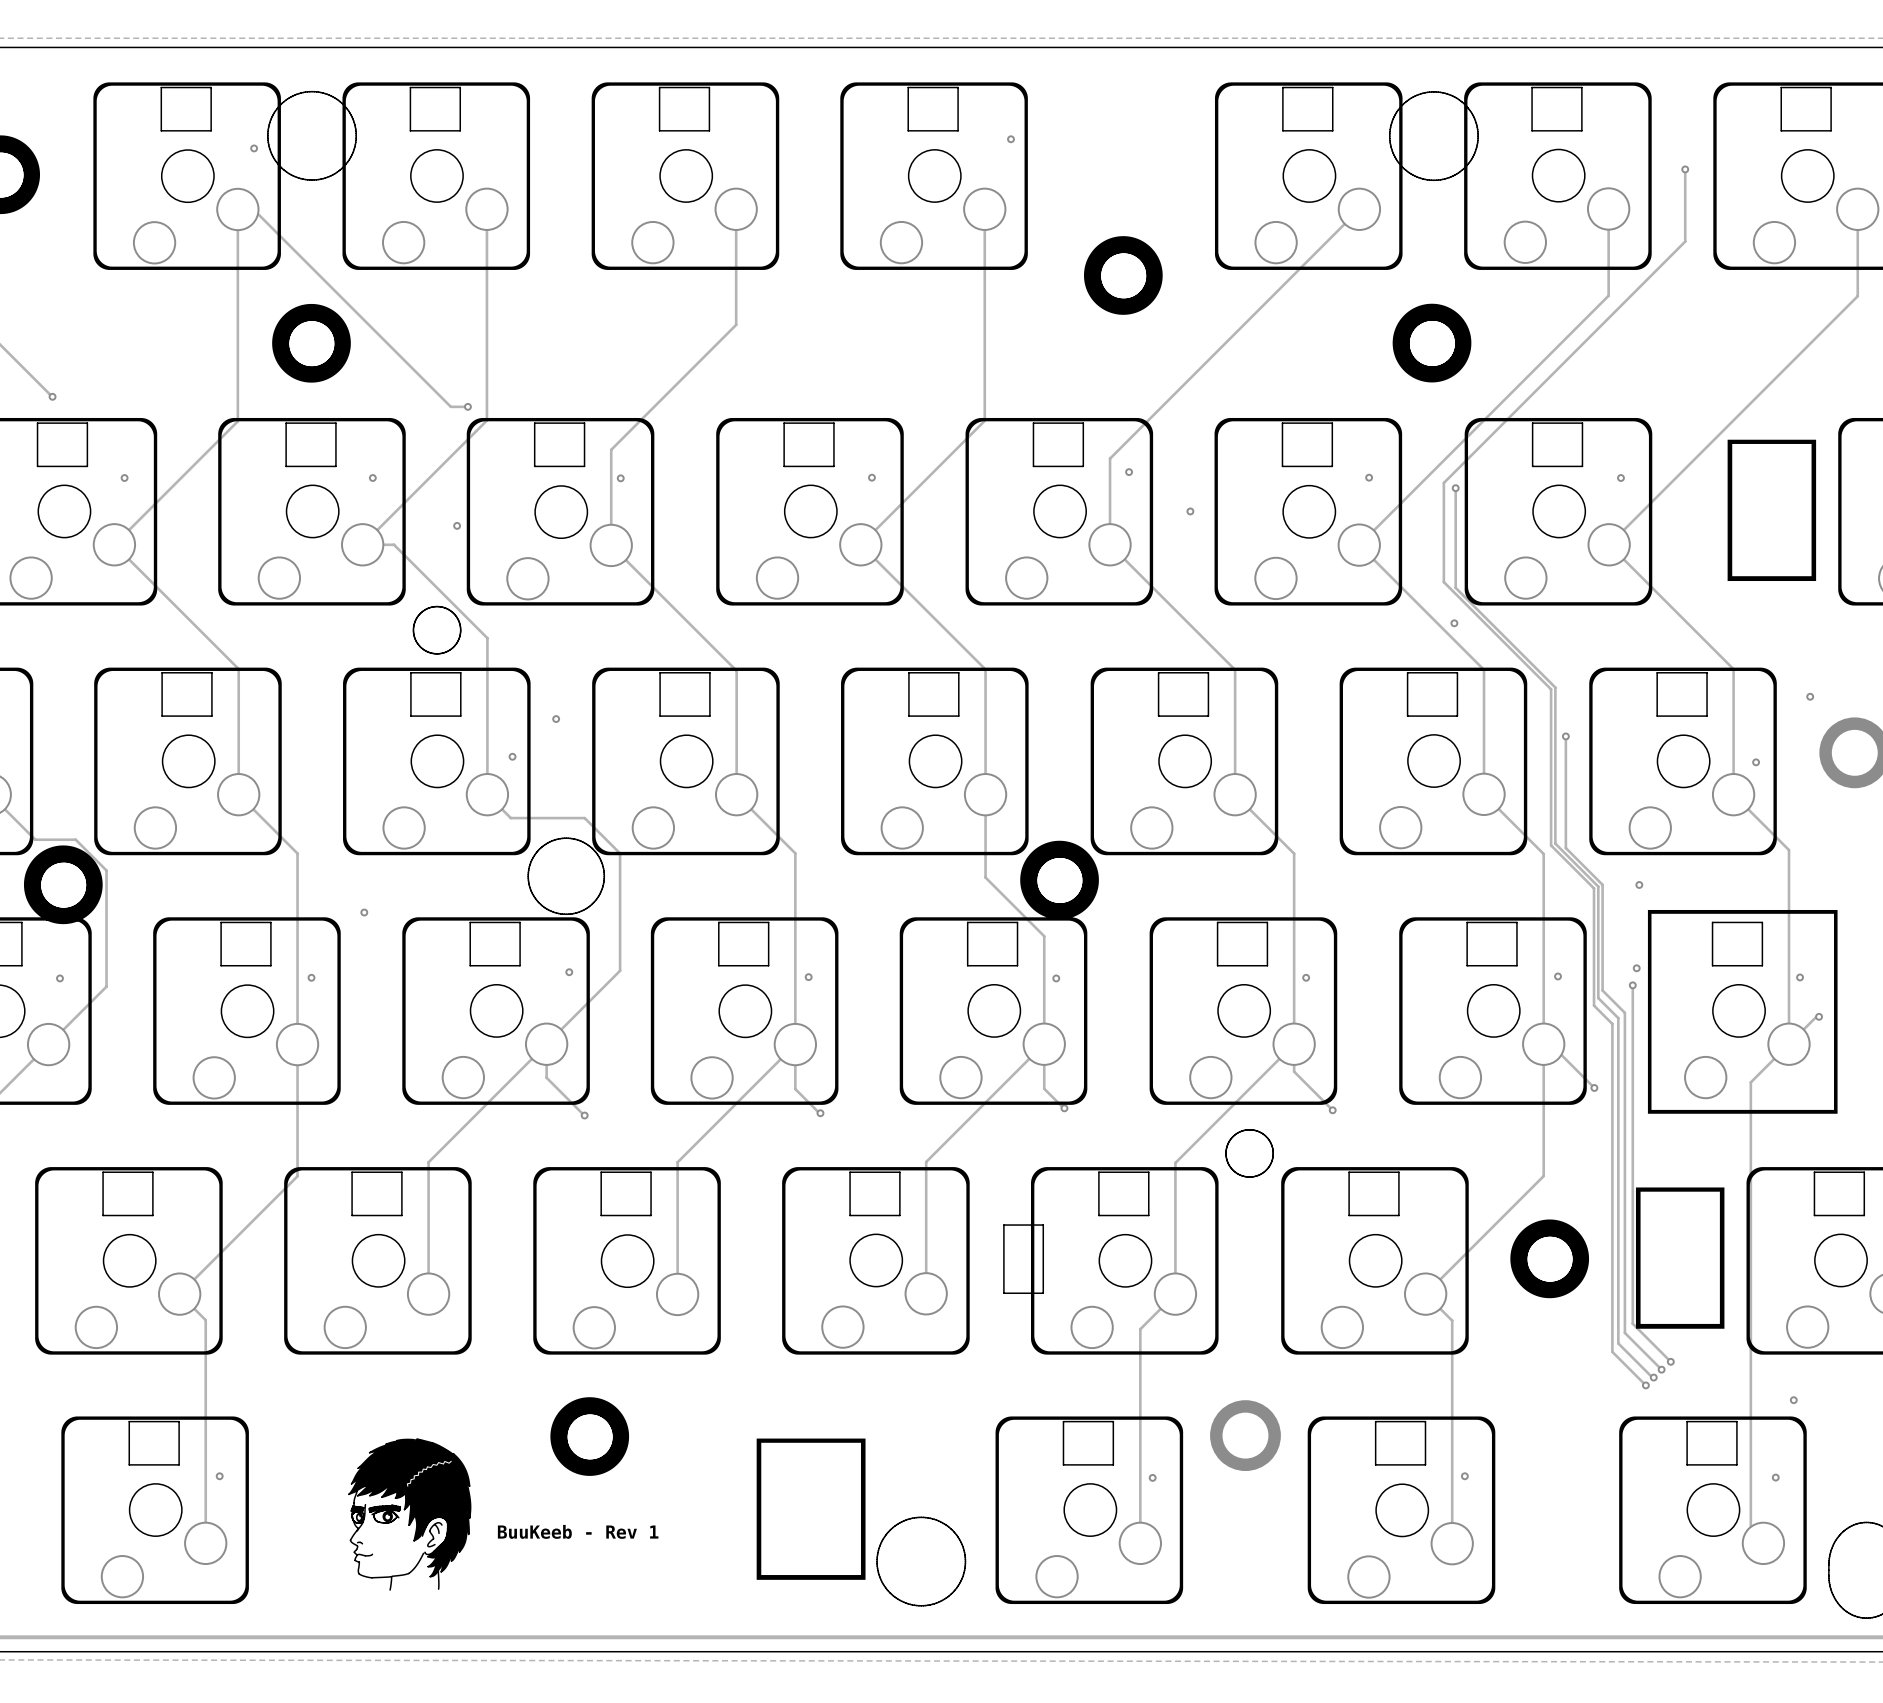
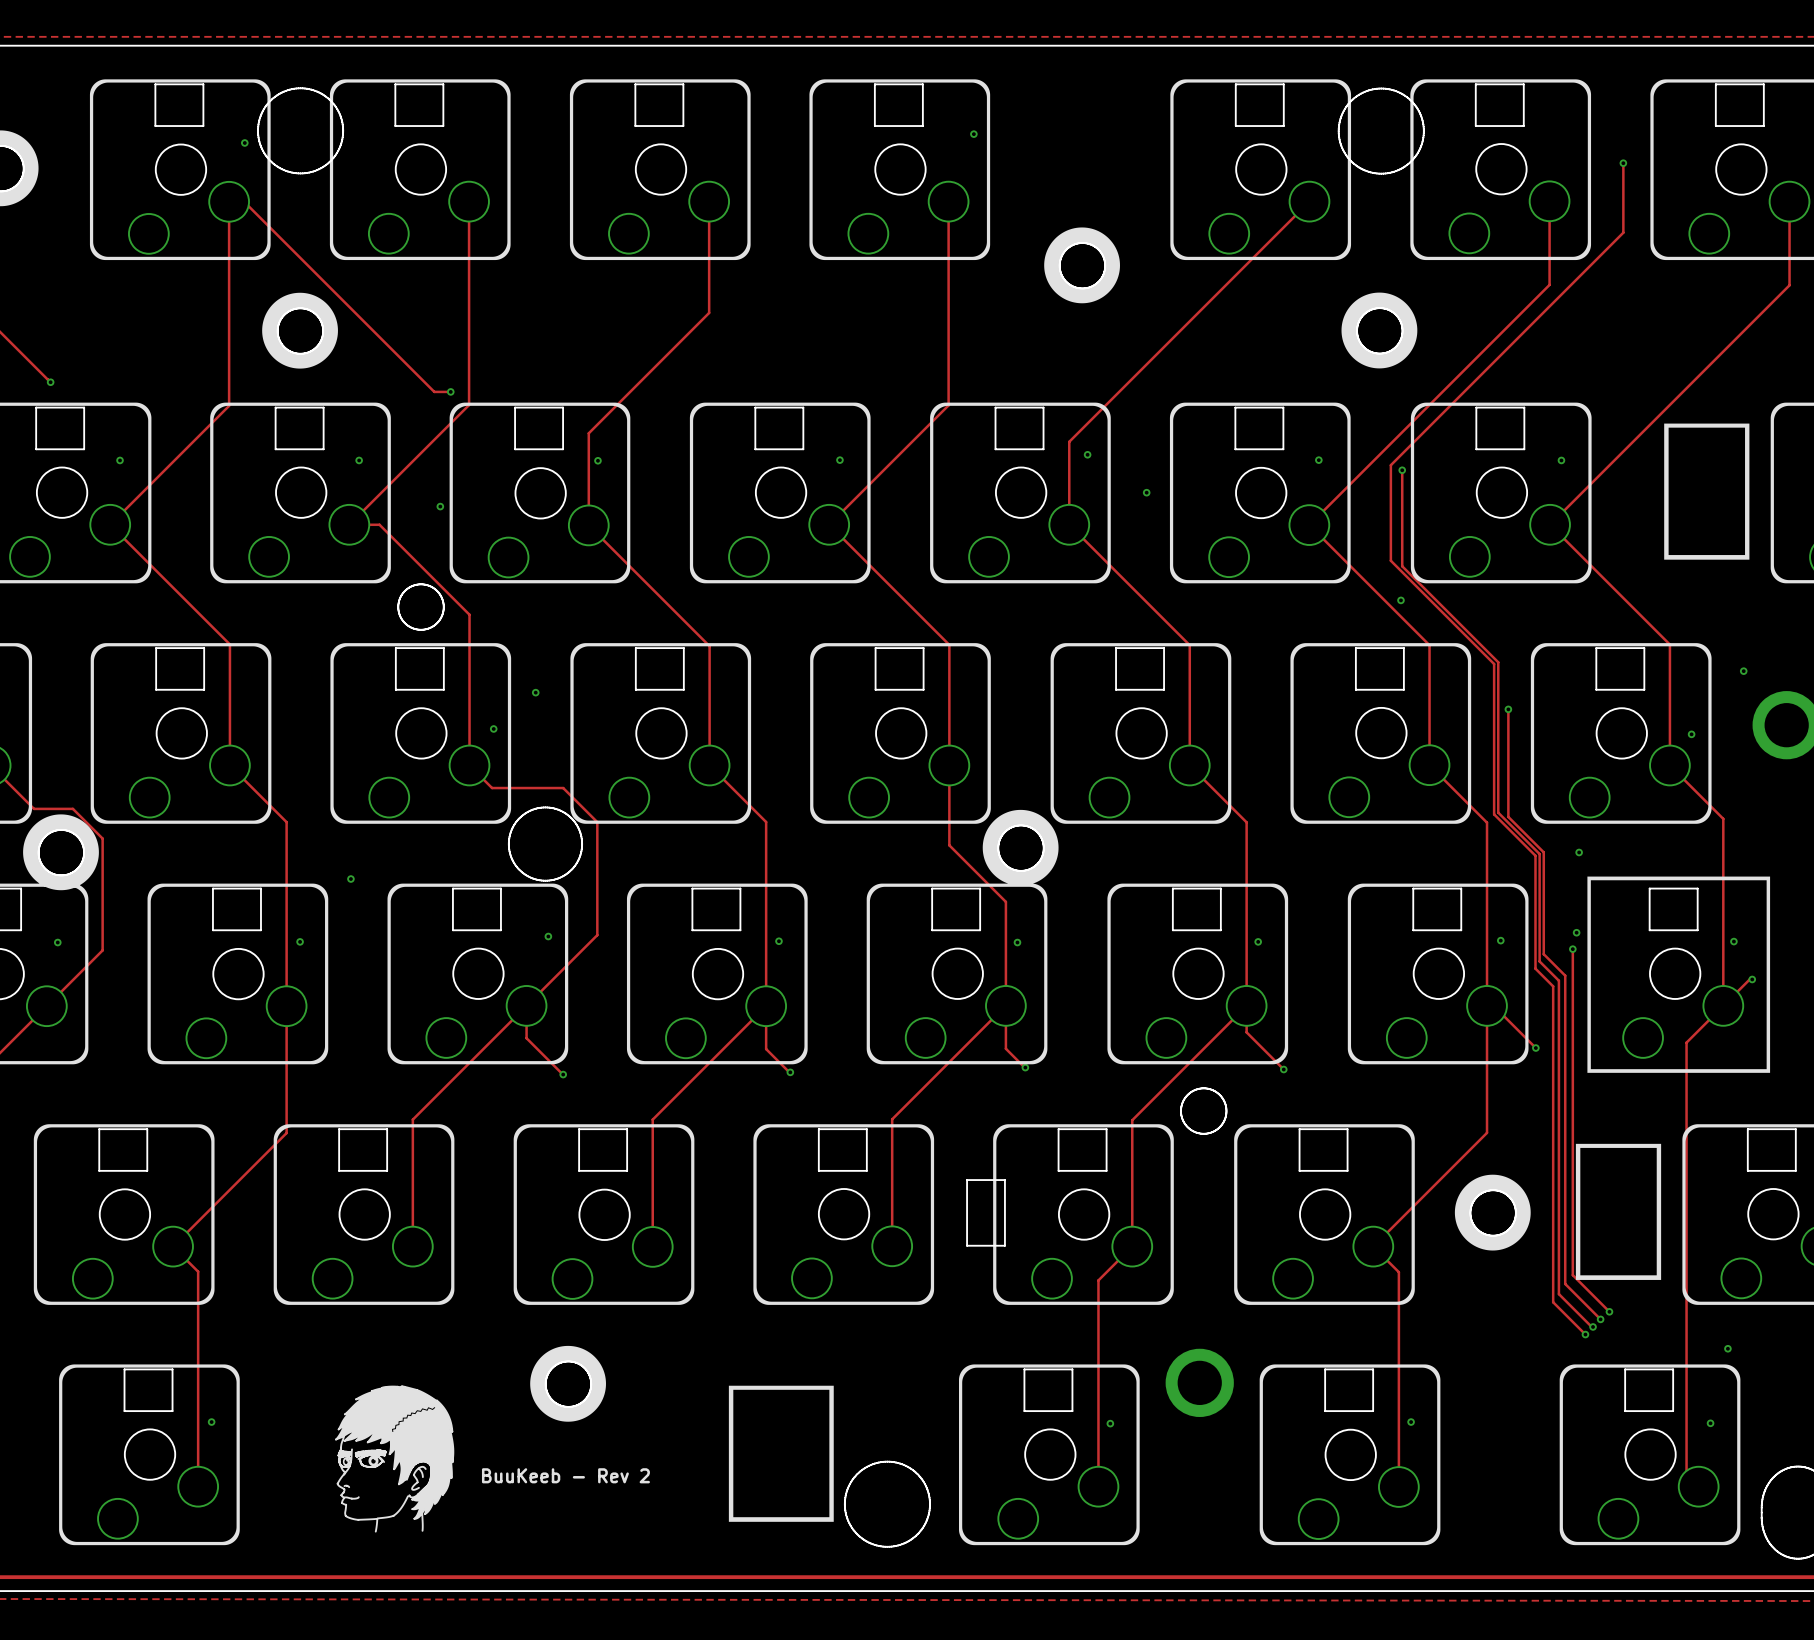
text: BuuKeeb - Rev 1 (578, 1531) -> BuuKeeb - Rev 2 (565, 1475)

